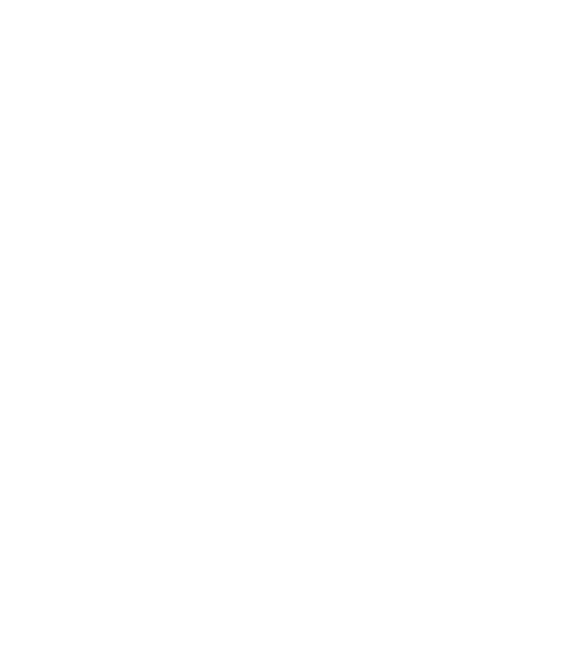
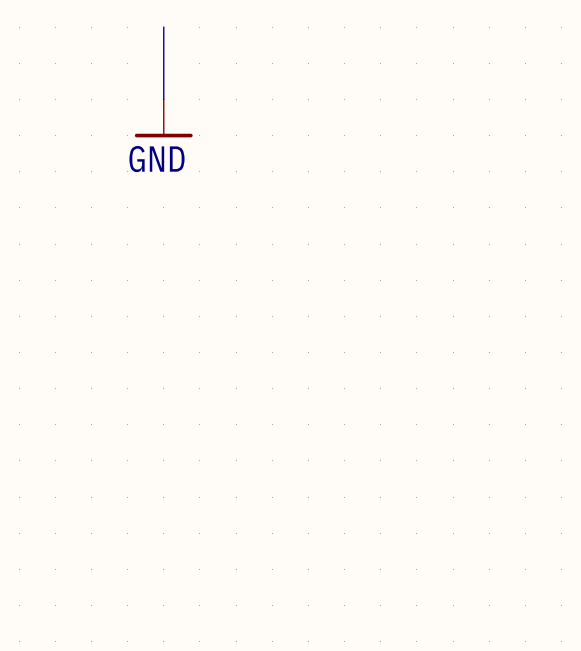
wire: none -> (163, 27) (163, 99)
power symbol: none -> GND (163, 118)

